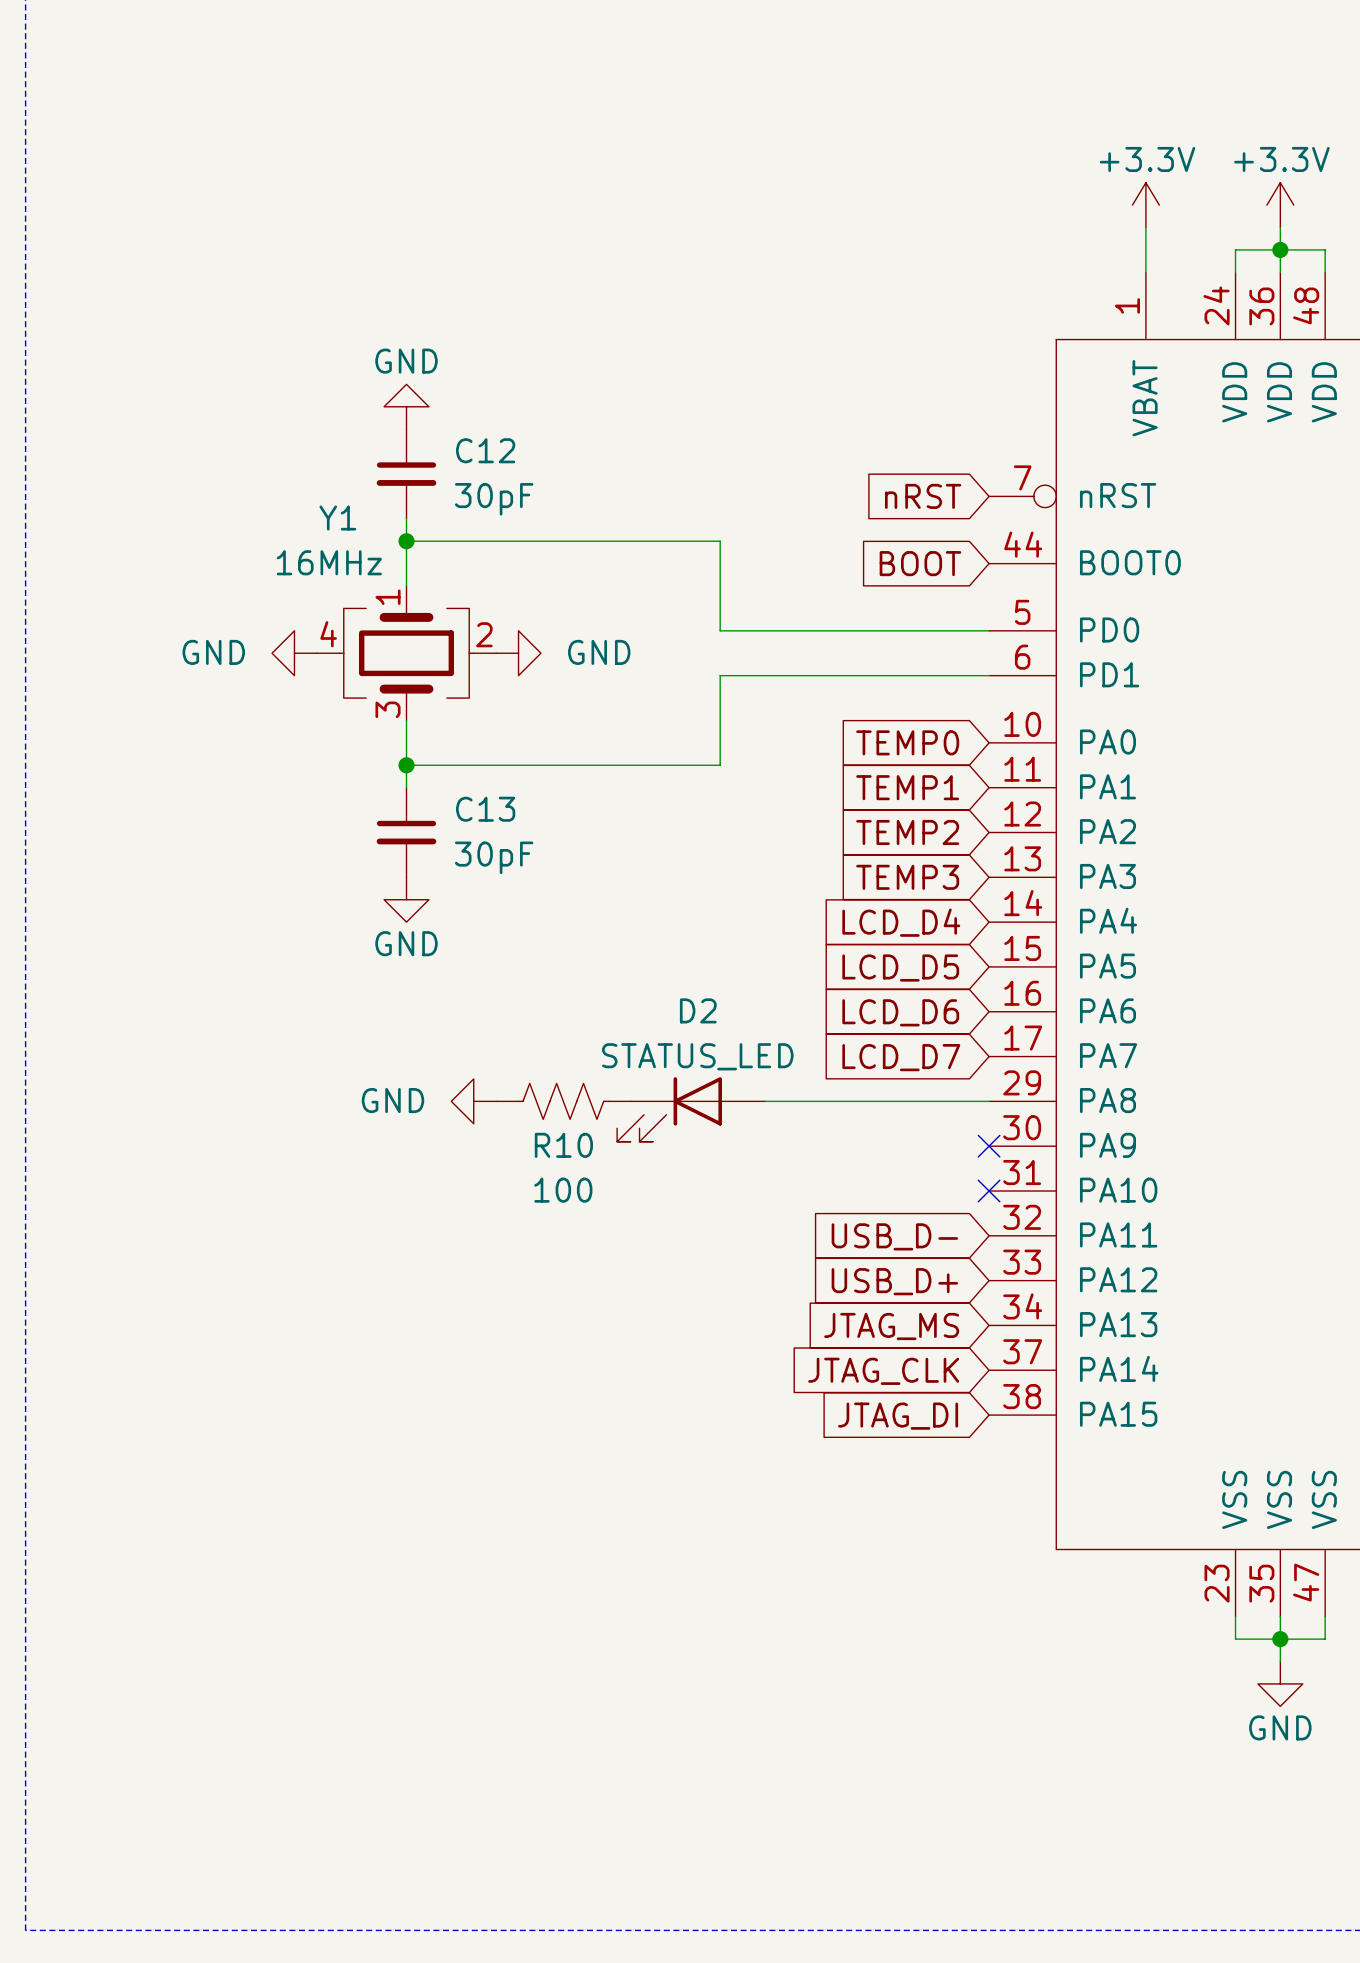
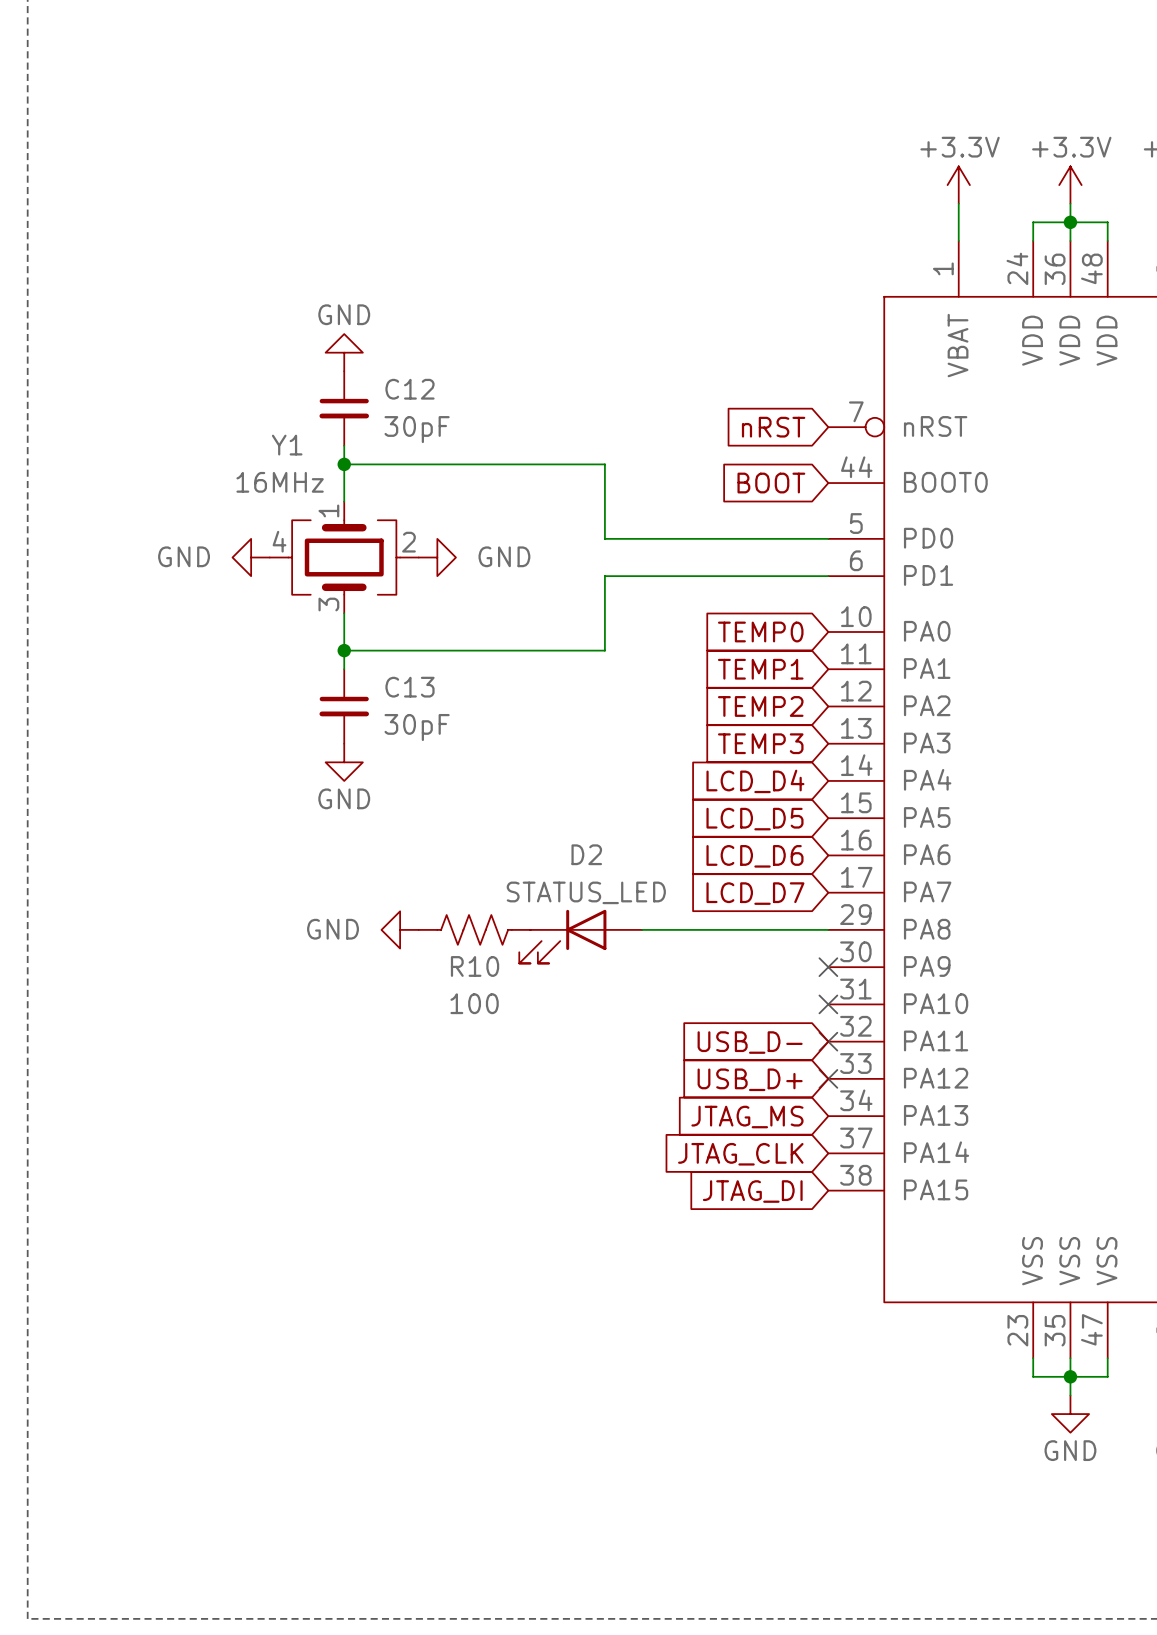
no-connect mark: none -> (828, 1041)
no-connect mark: none -> (828, 1078)

